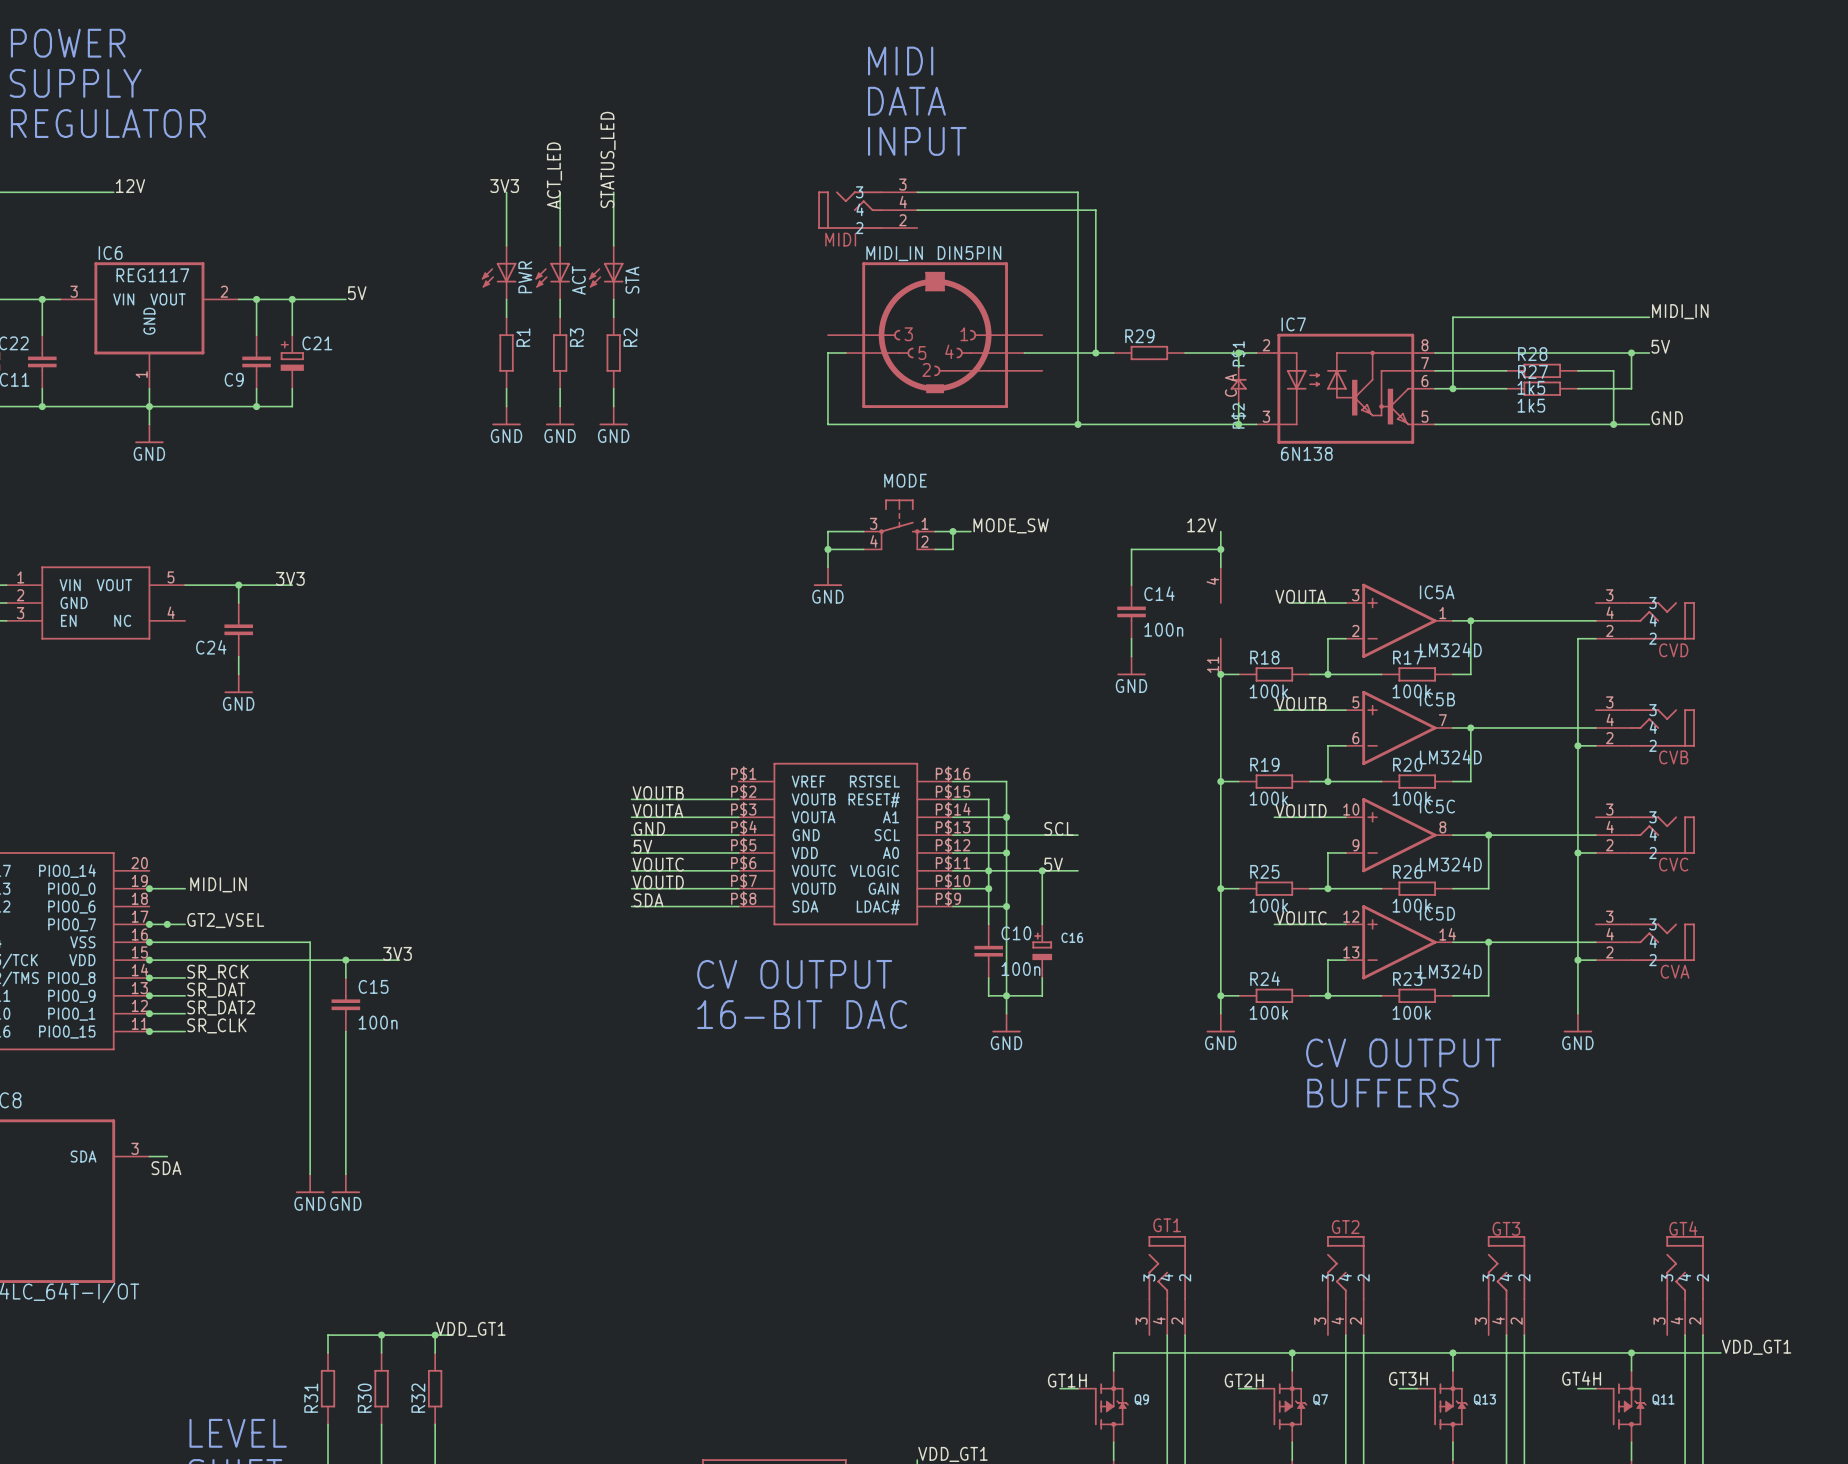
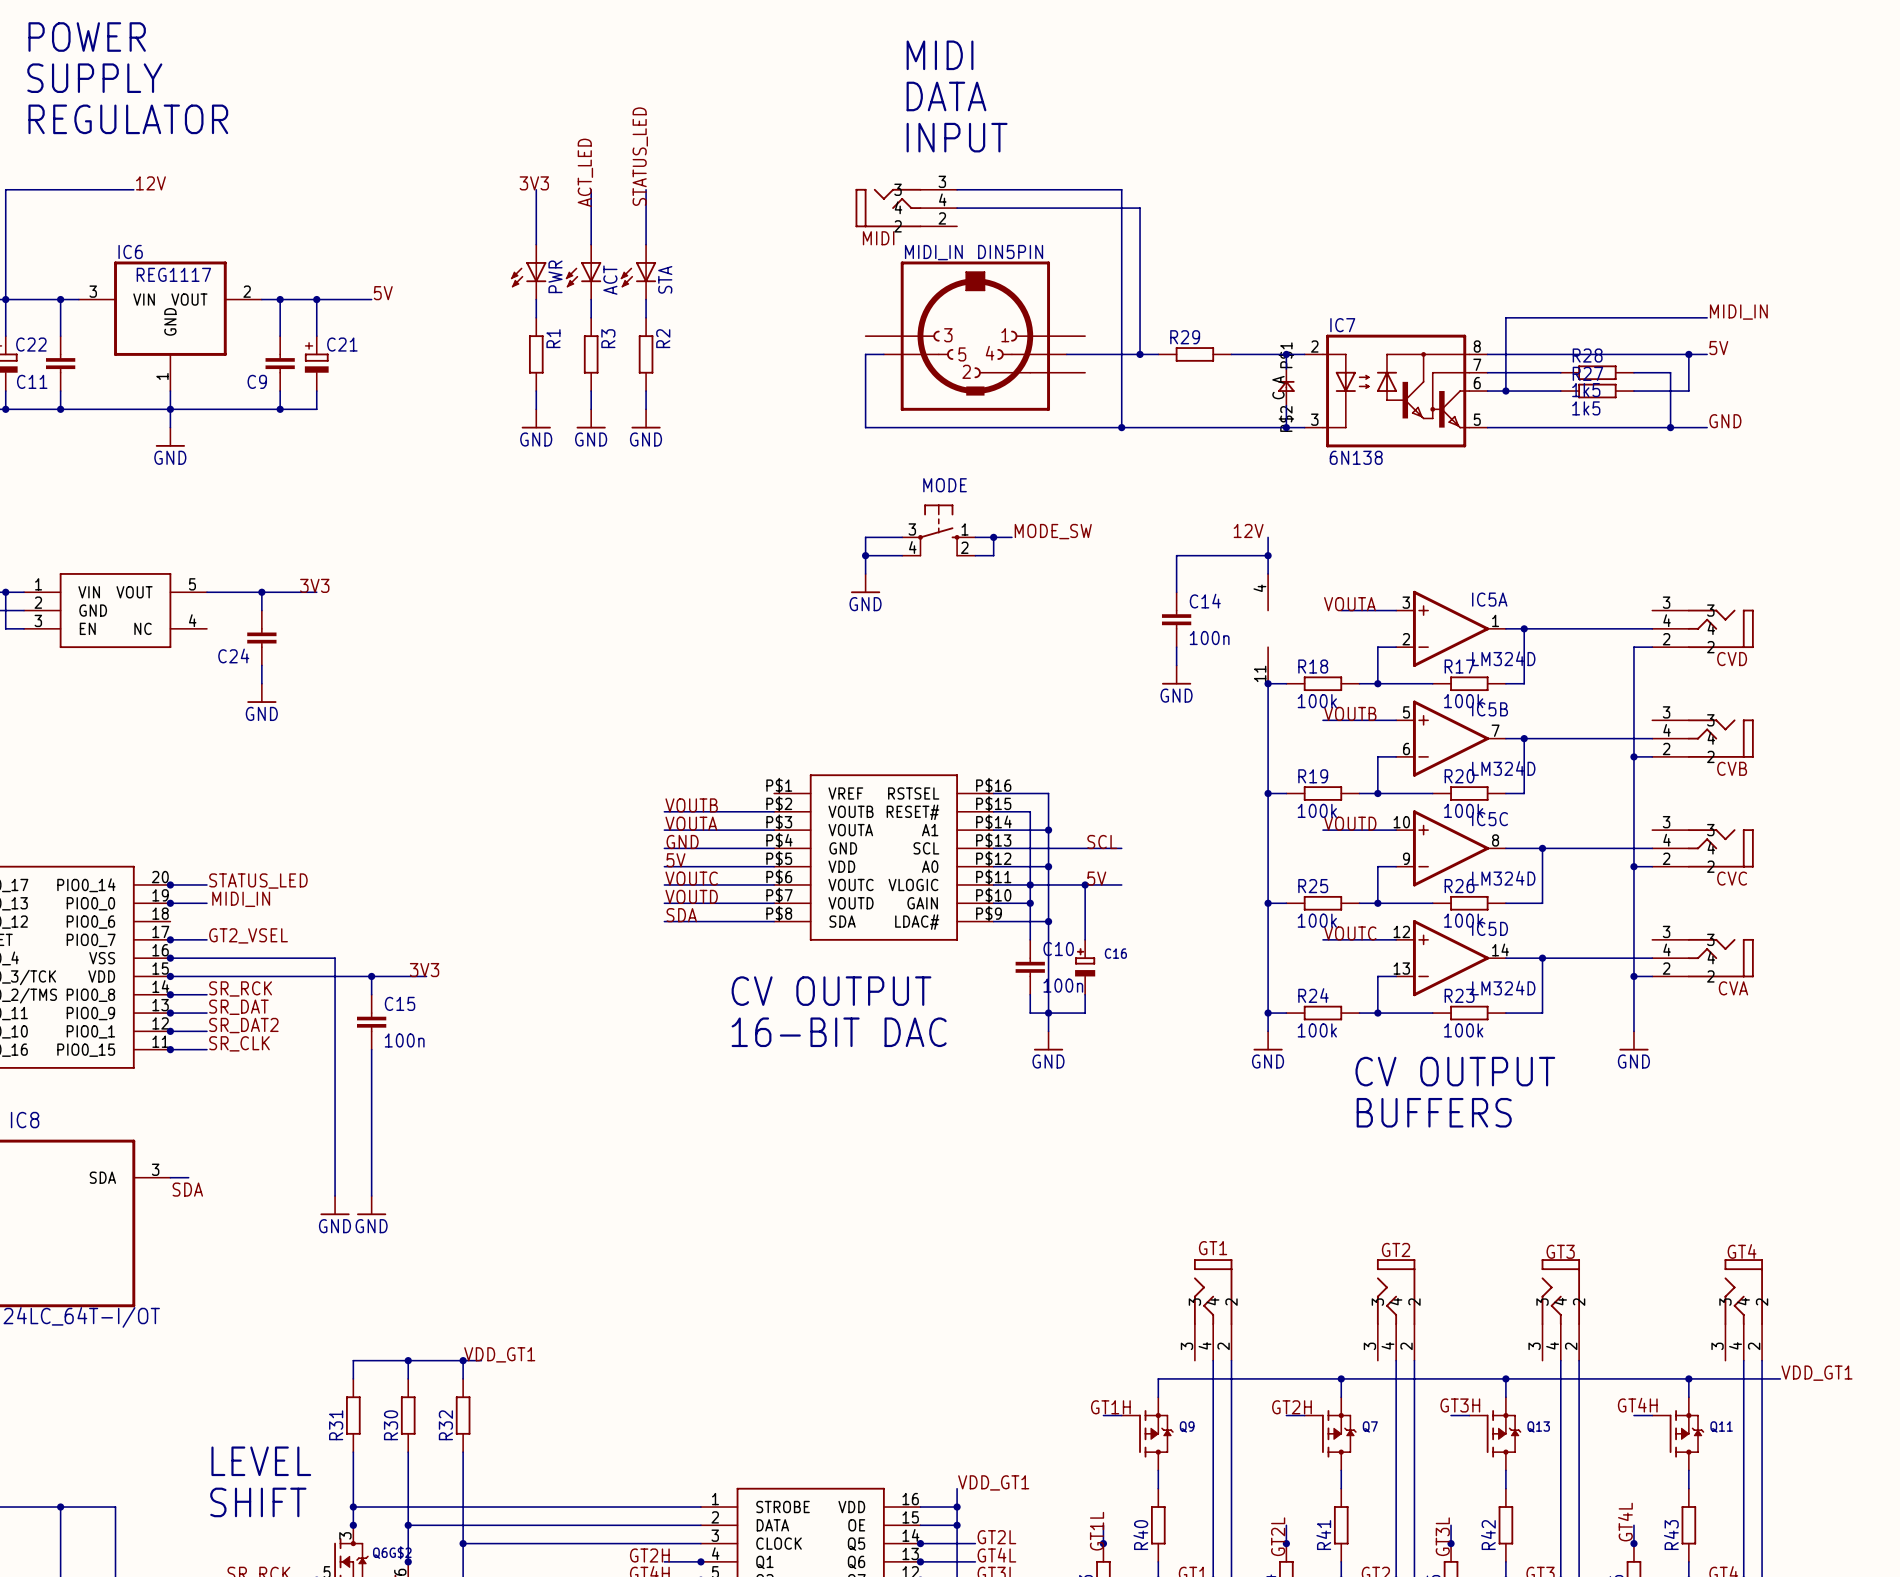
label: none -> STATUS_LED (258, 881)
wire: none -> (170, 884) (206, 884)
junction: none -> (170, 884)
junction: (167, 924) -> none

